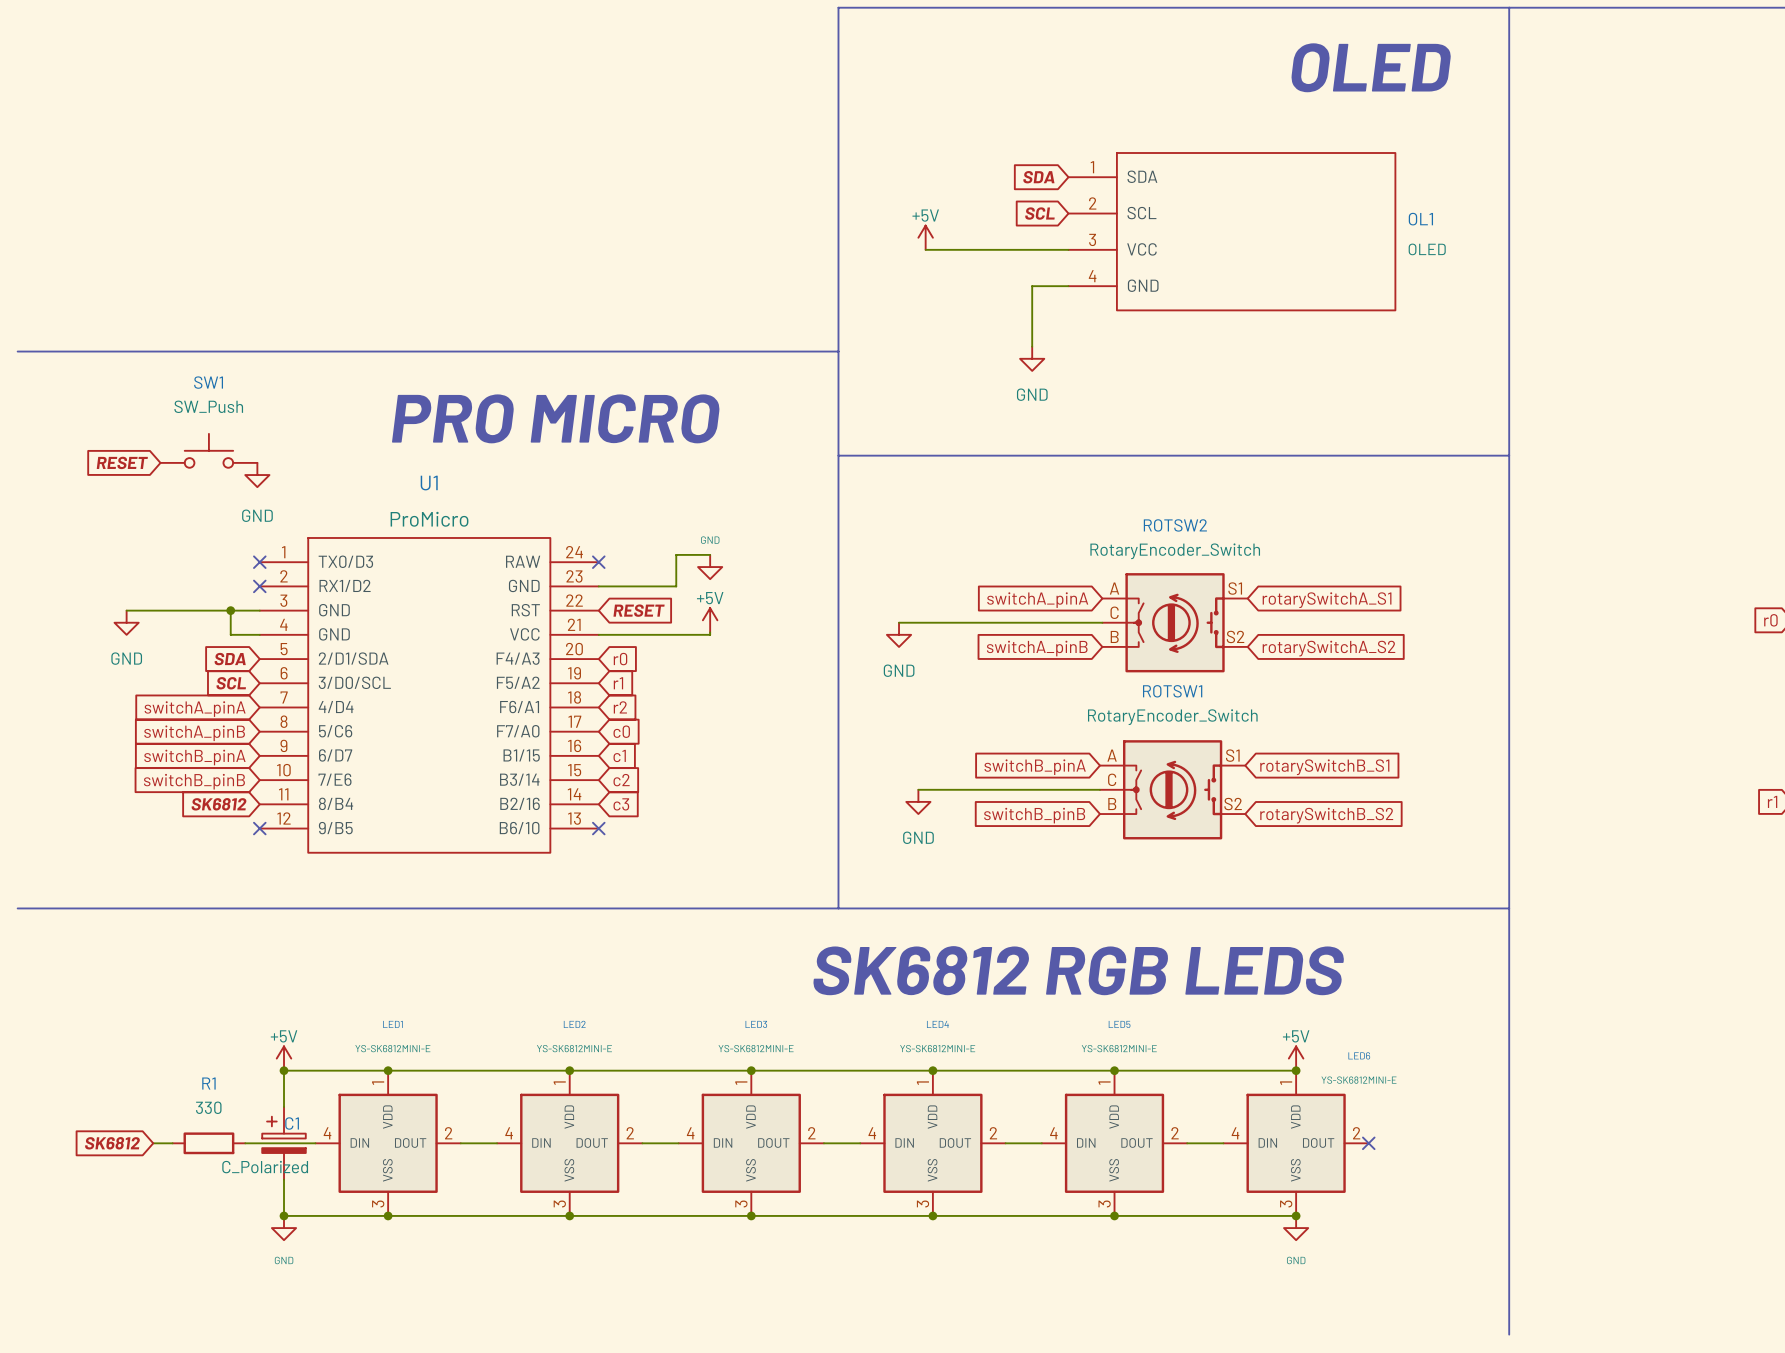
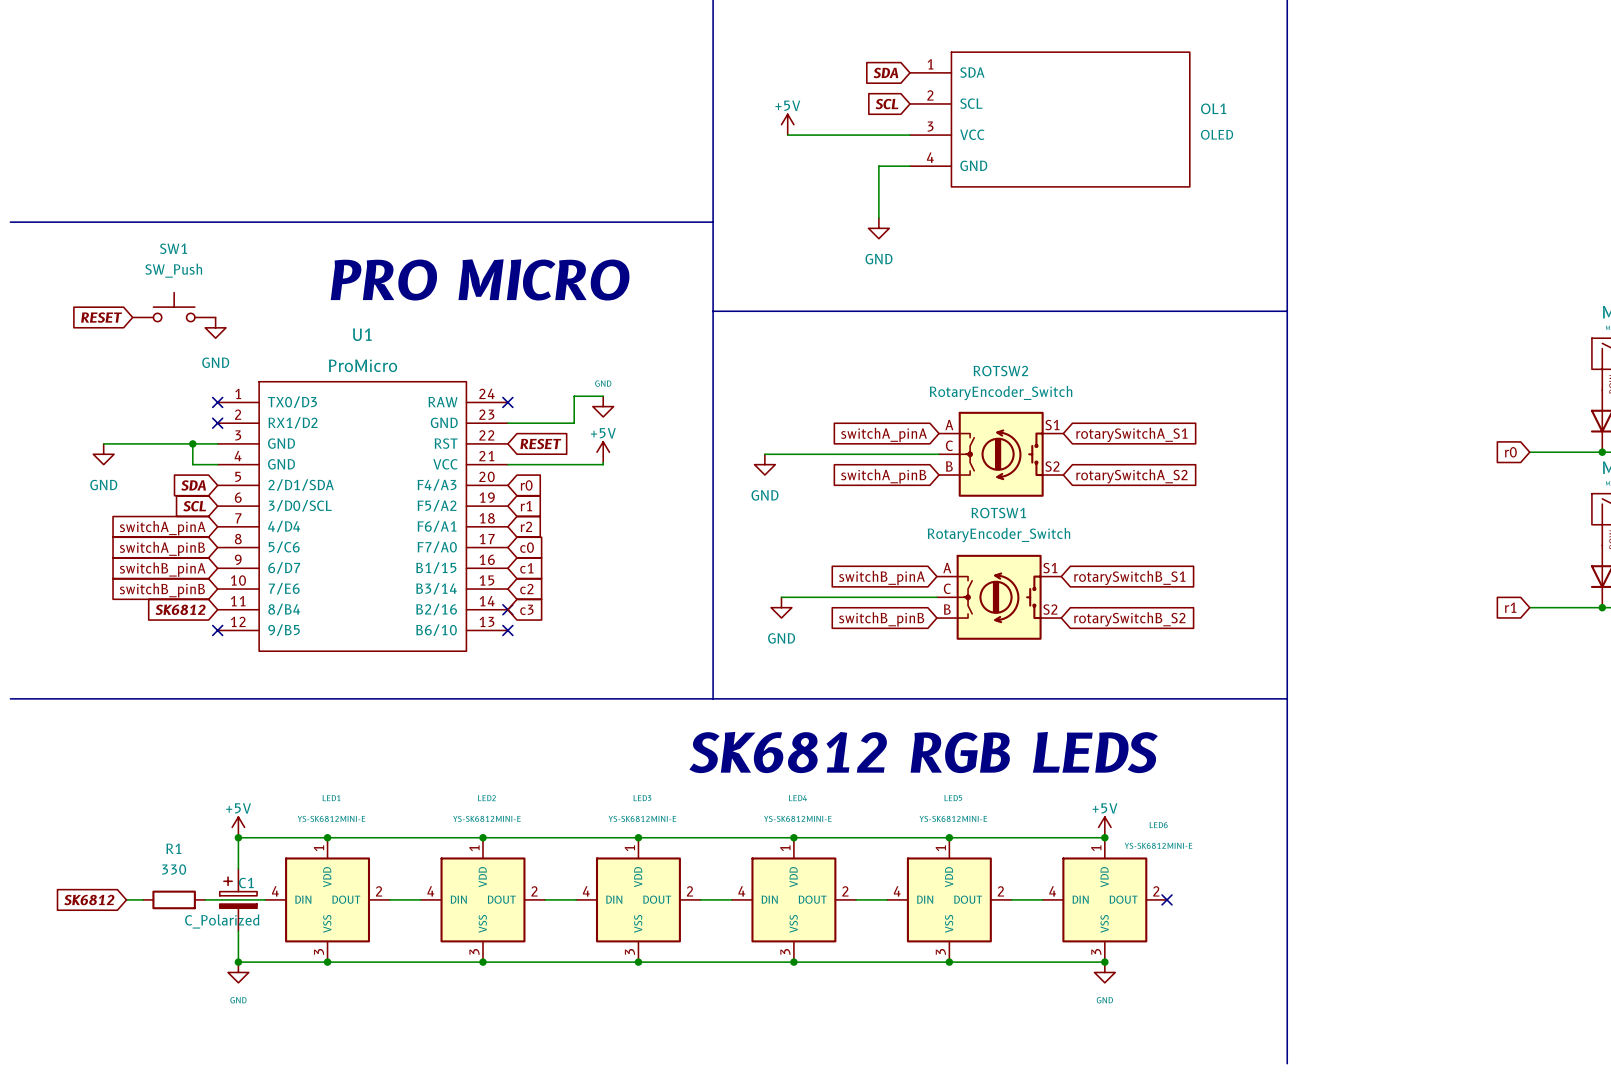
no-connect mark: none -> (507, 609)

